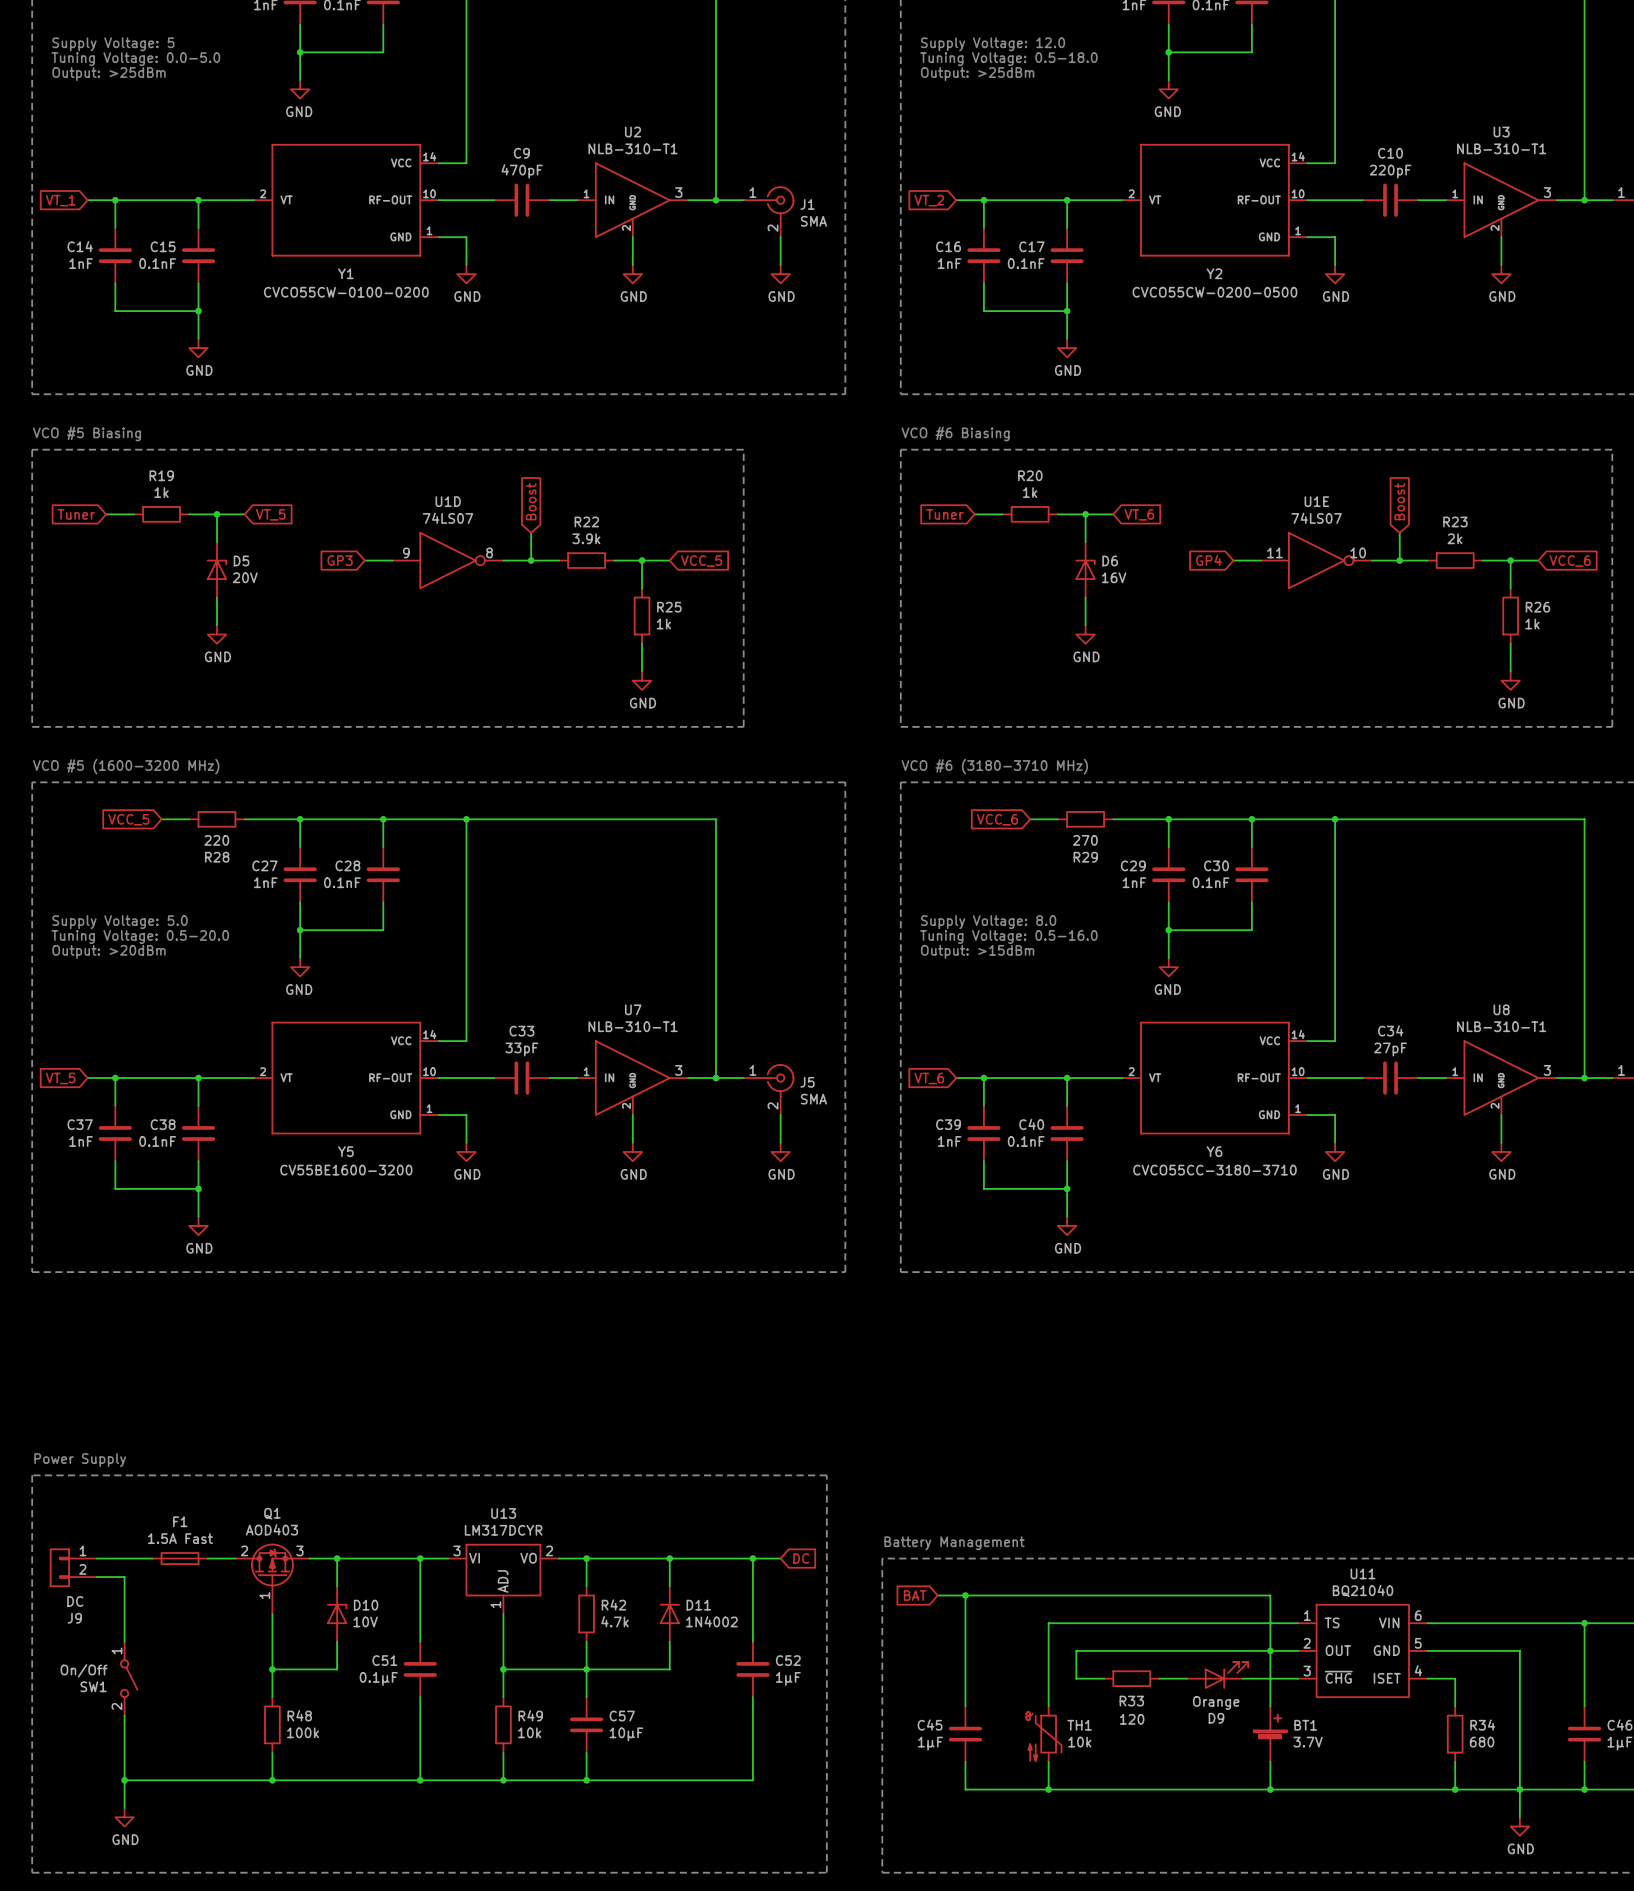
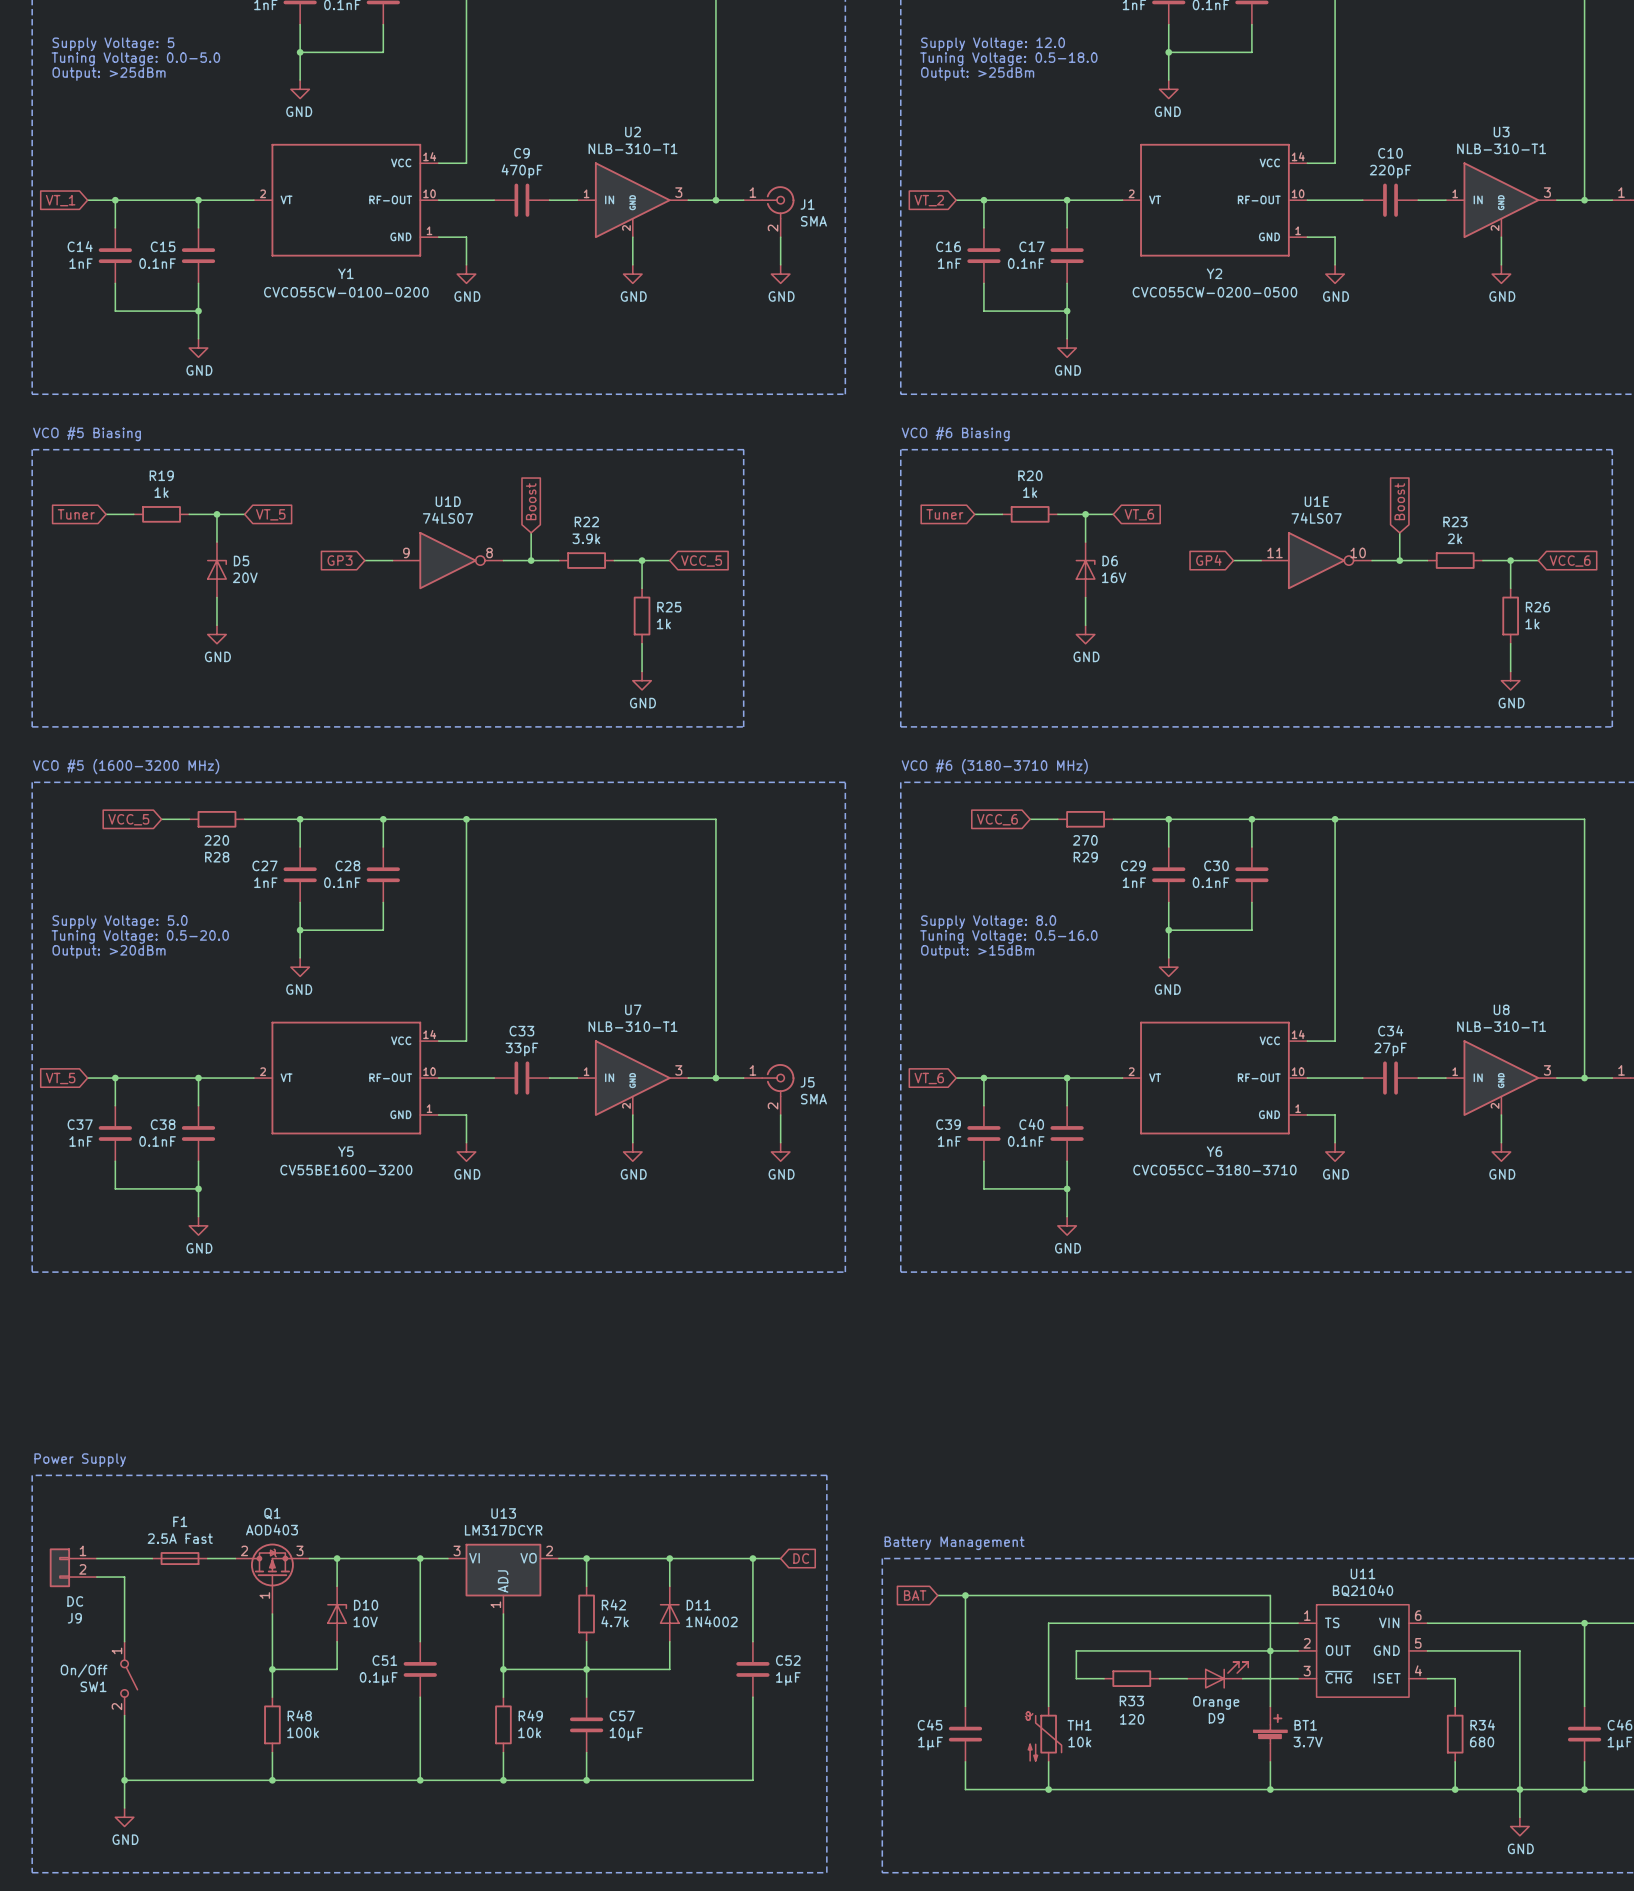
F1 value: 1.5A Fast (180, 1538) -> 2.5A Fast (180, 1538)

